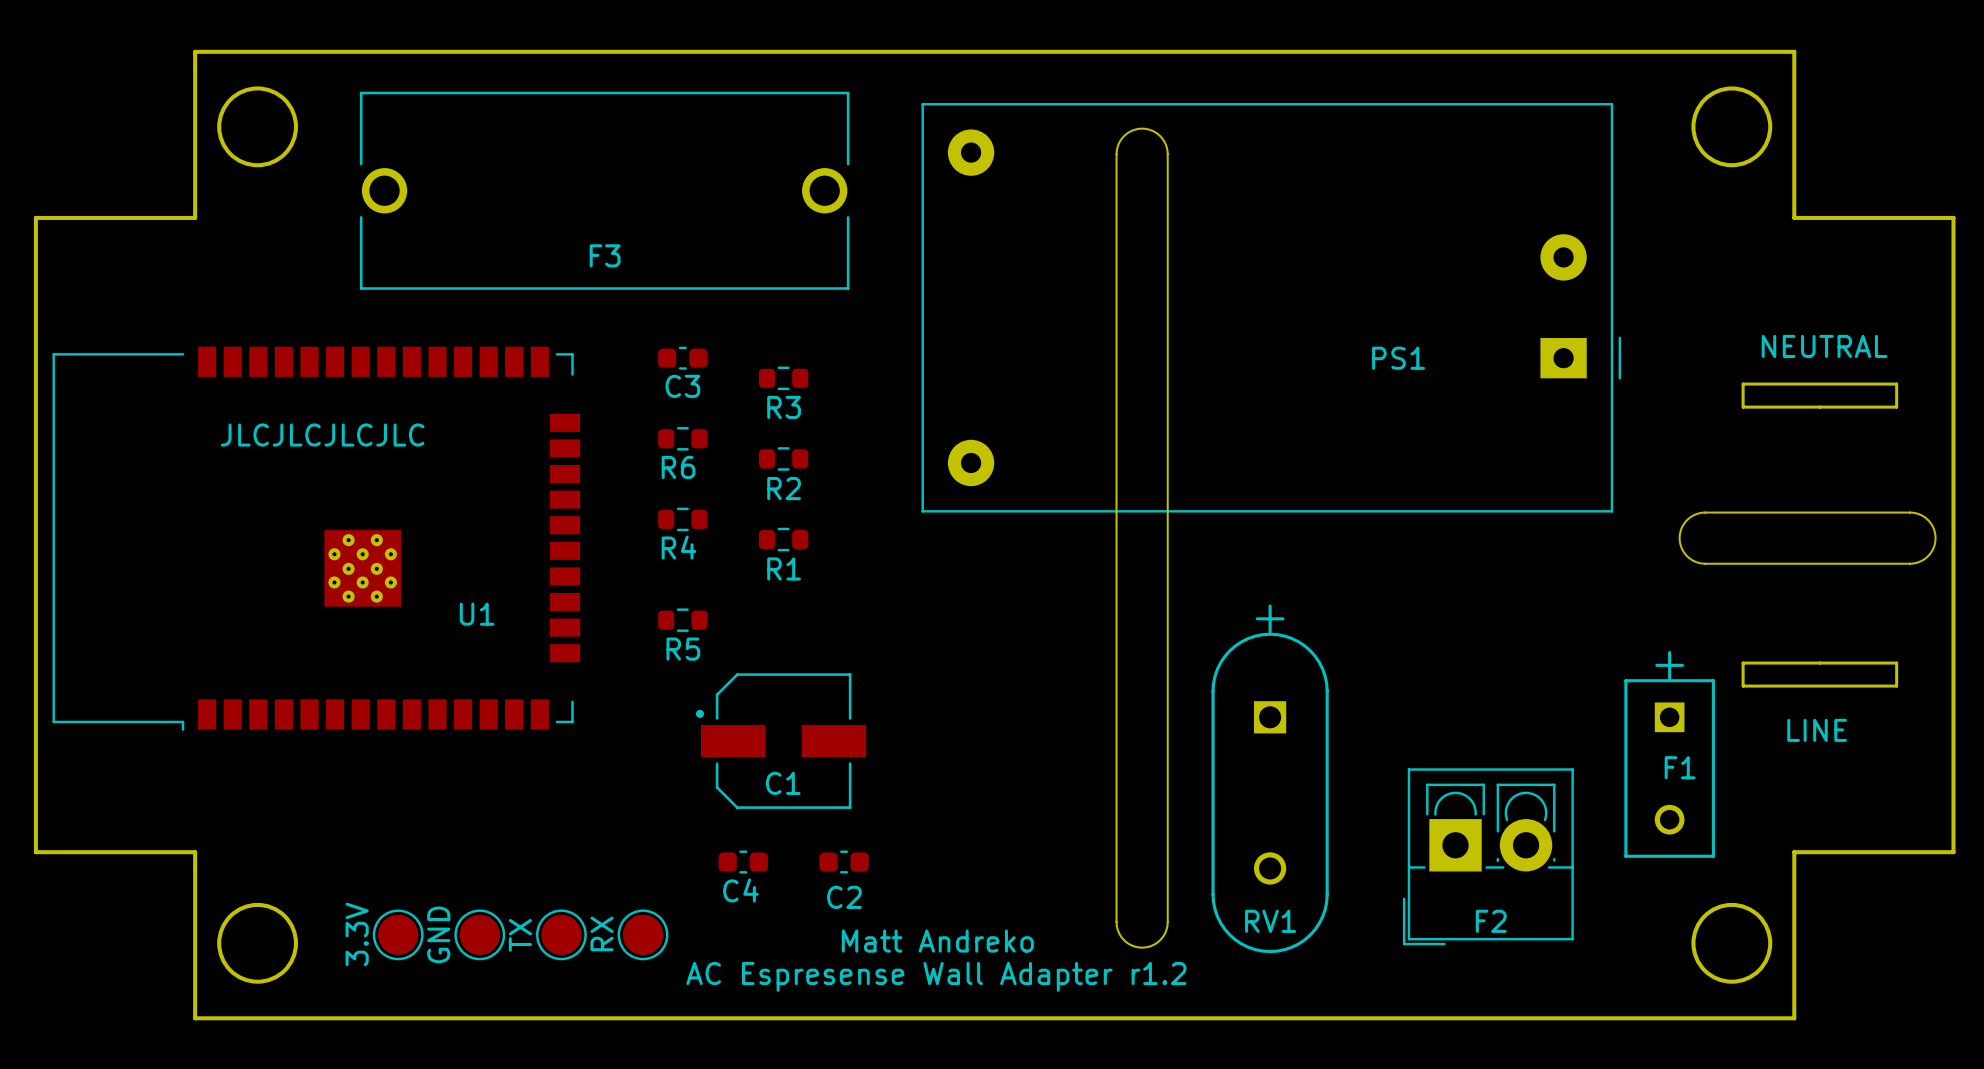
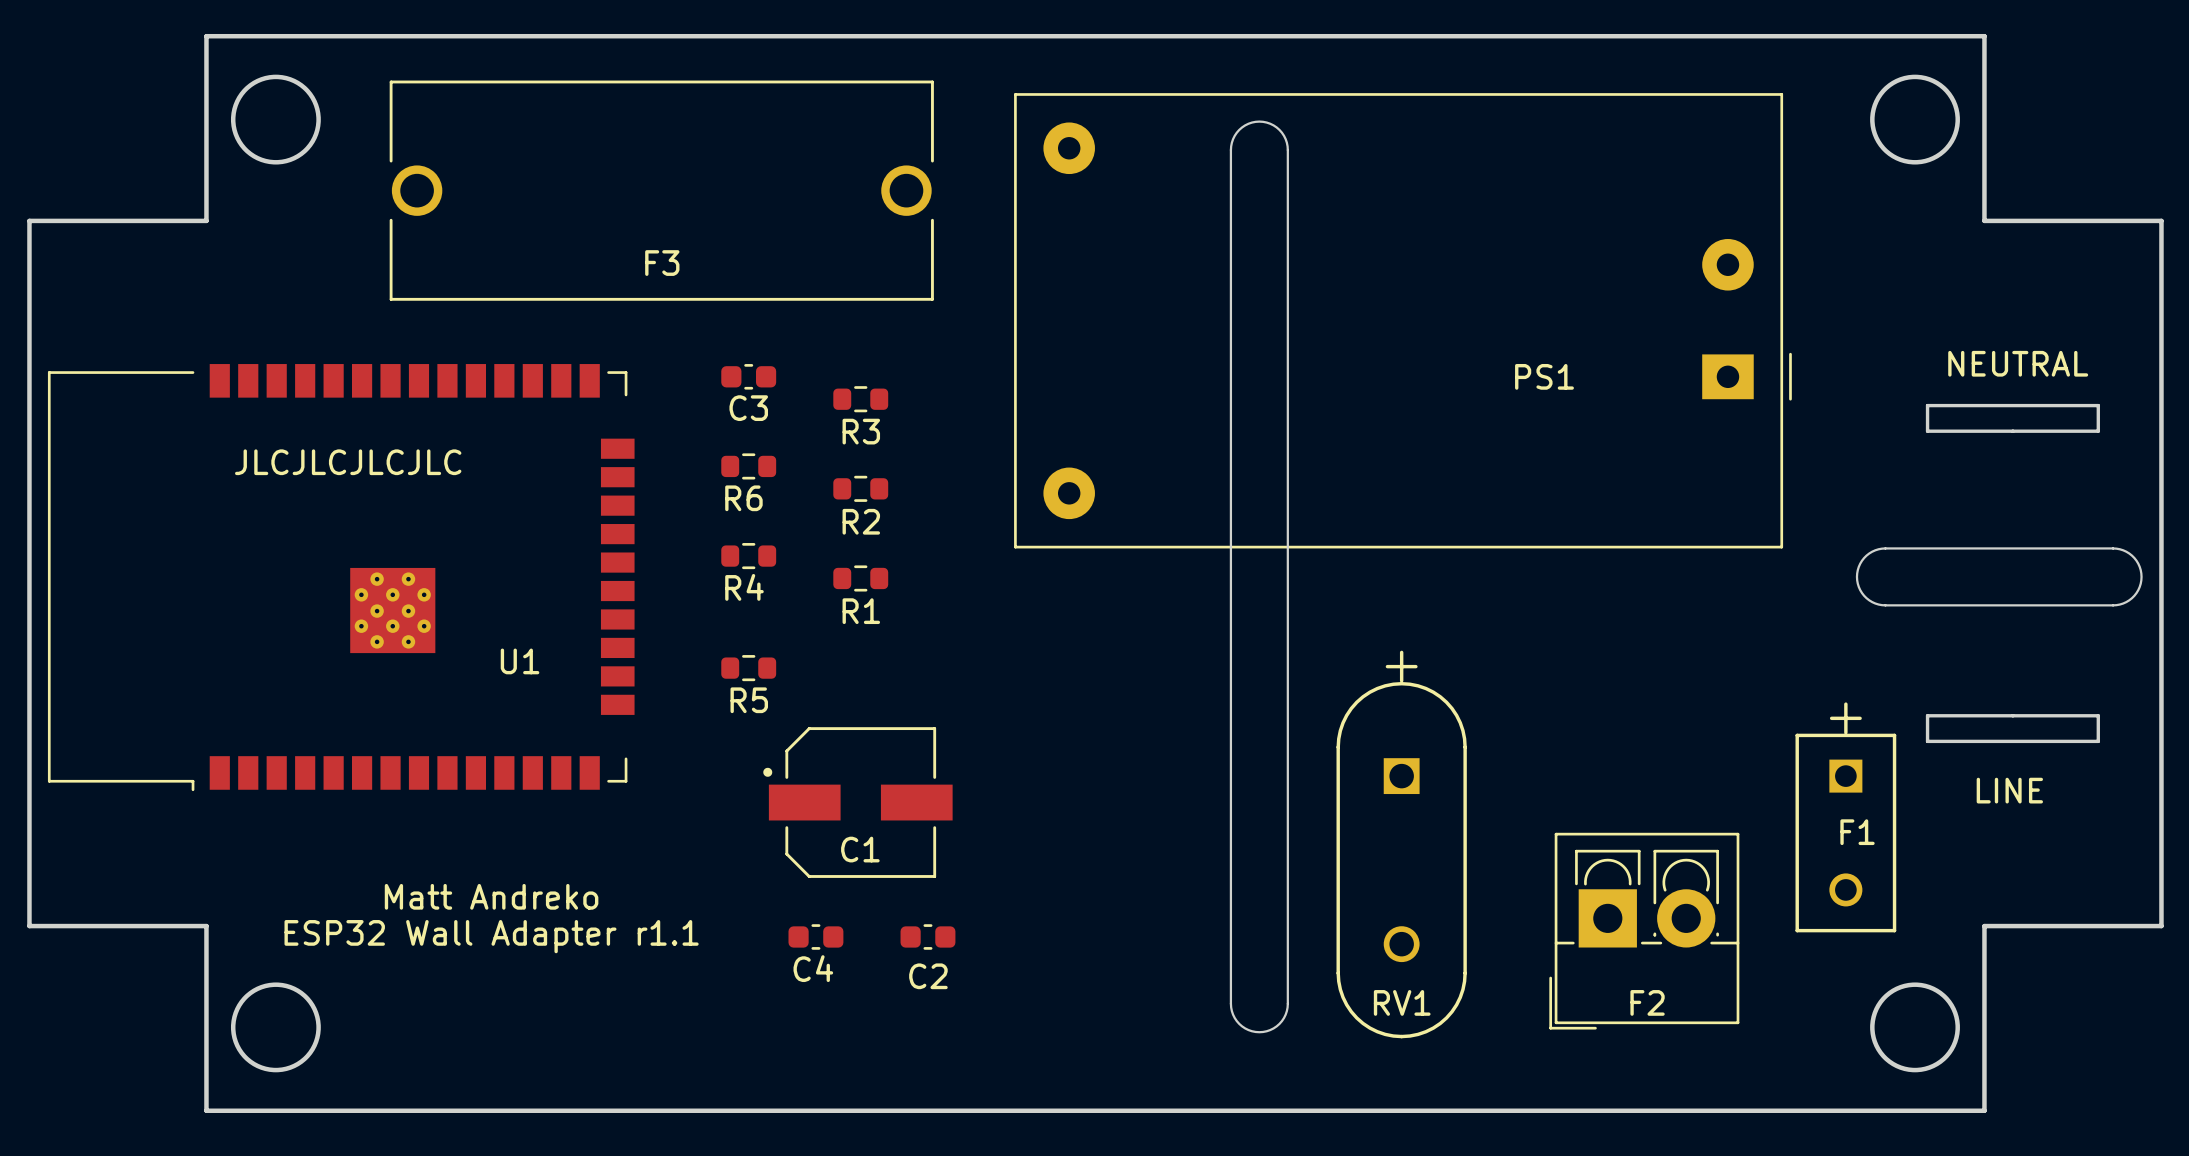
text: none -> ESP32 Wall Adapter r1.1 (491, 936)
3.3V: (398, 934) -> none
GND: (479, 934) -> none
TX: (561, 934) -> none
RX: (643, 934) -> none
text position: Matt Andreko (937, 941) -> Matt Andreko (491, 896)
text: AC Espresense Wall Adapter r1.2 (936, 976) -> none

